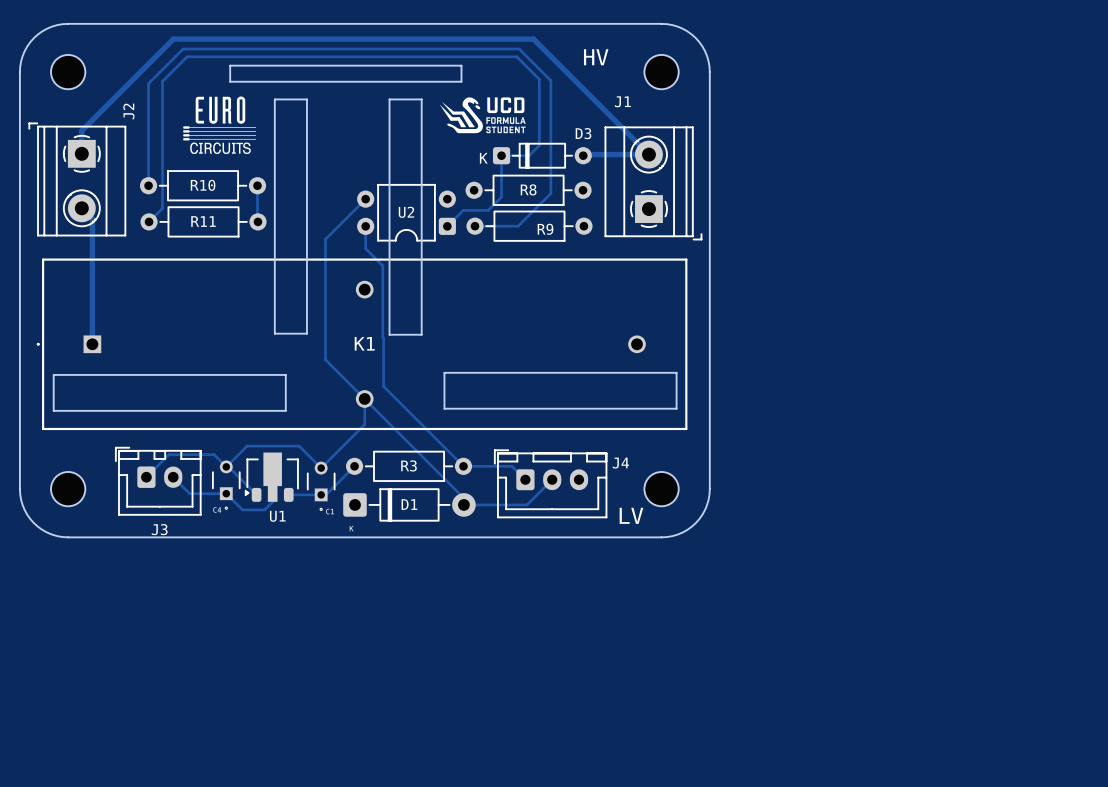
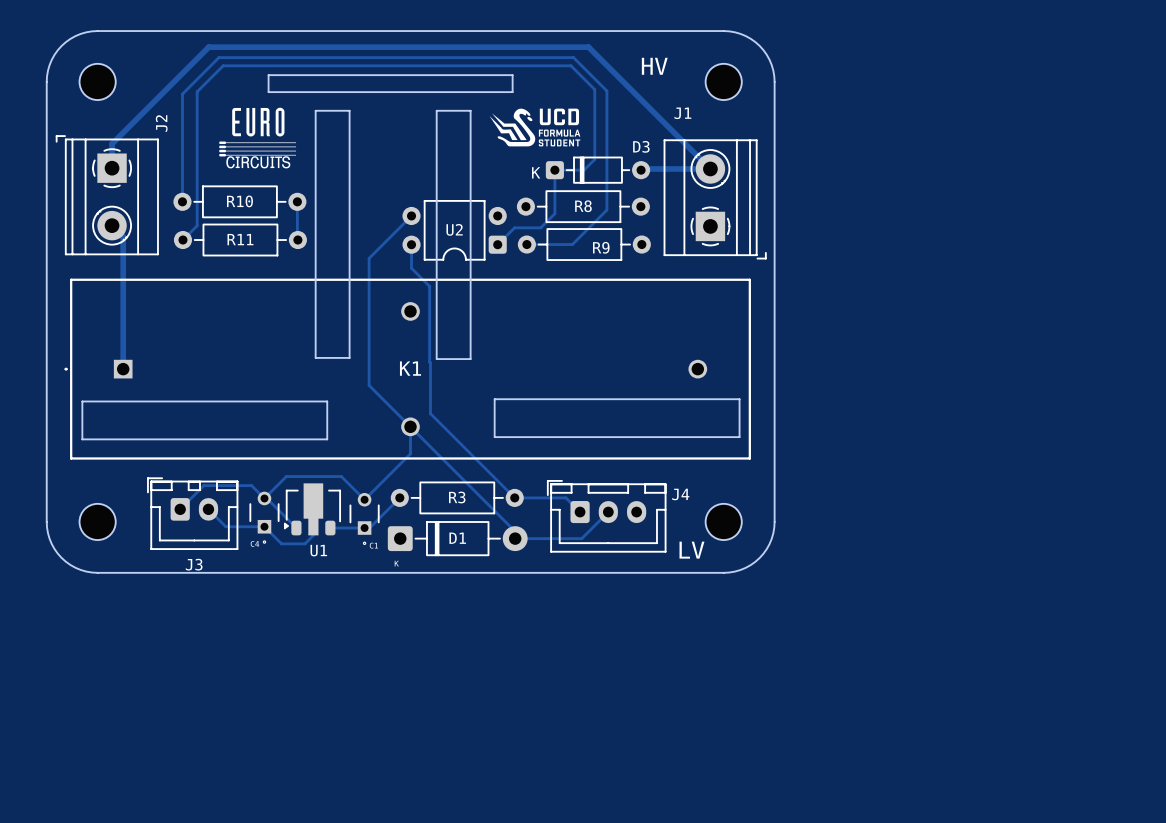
drawing: [183, 126, 256, 141] -> none
drawing: none -> [219, 141, 297, 157]

